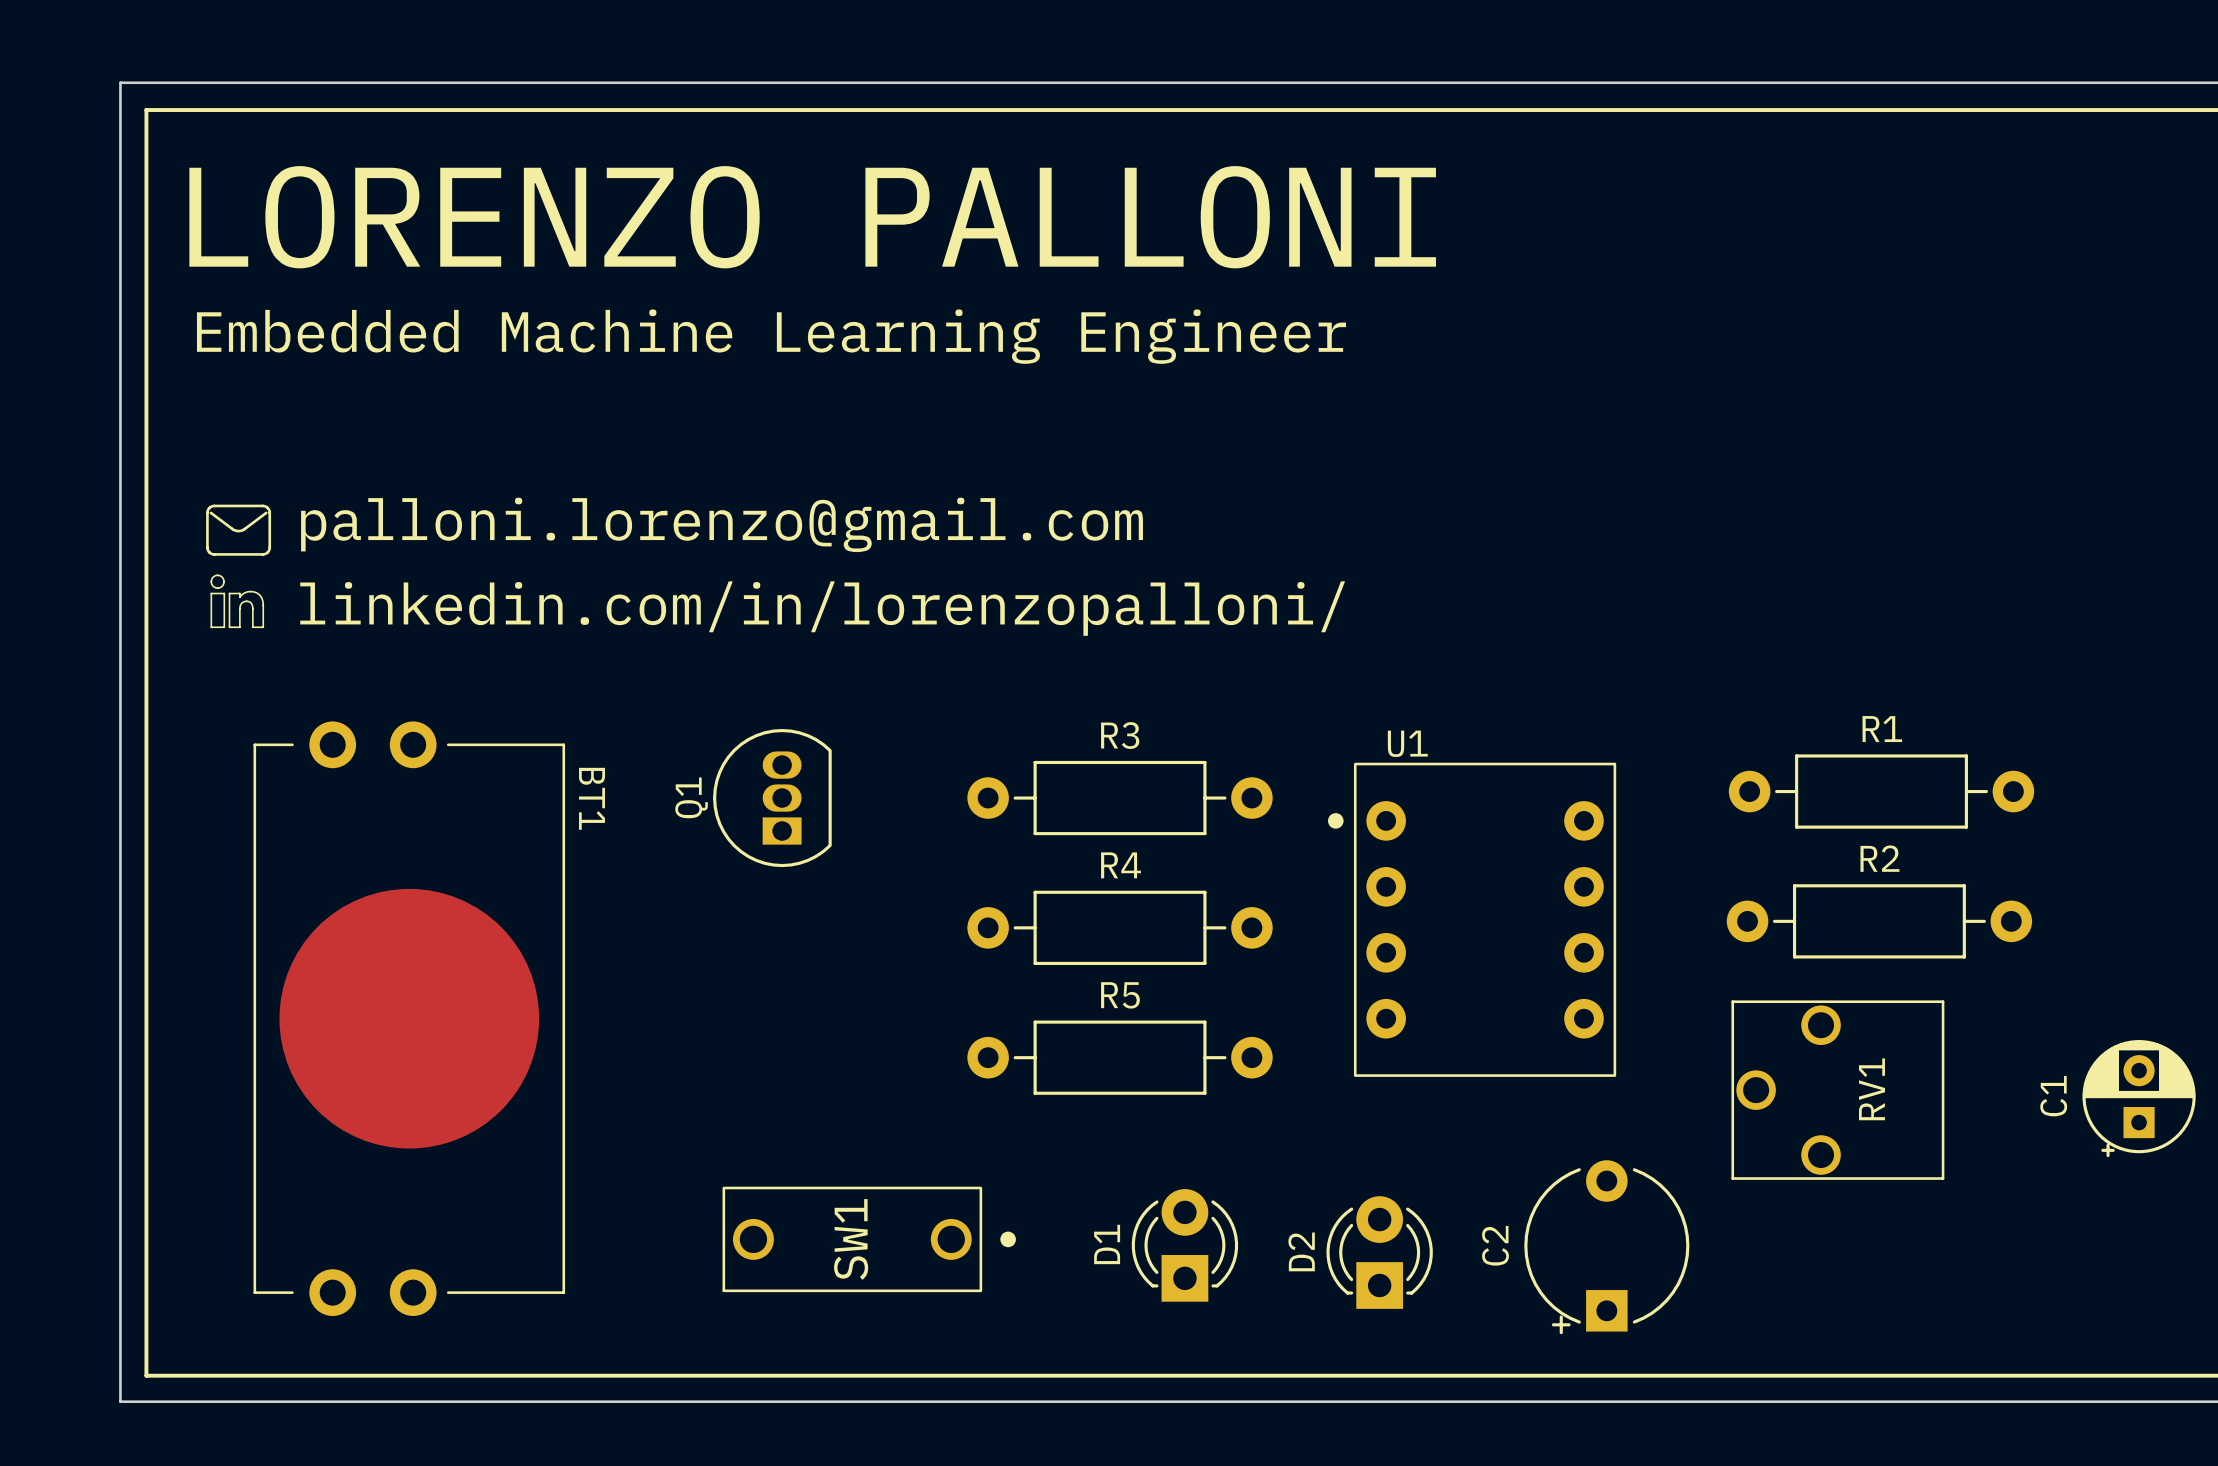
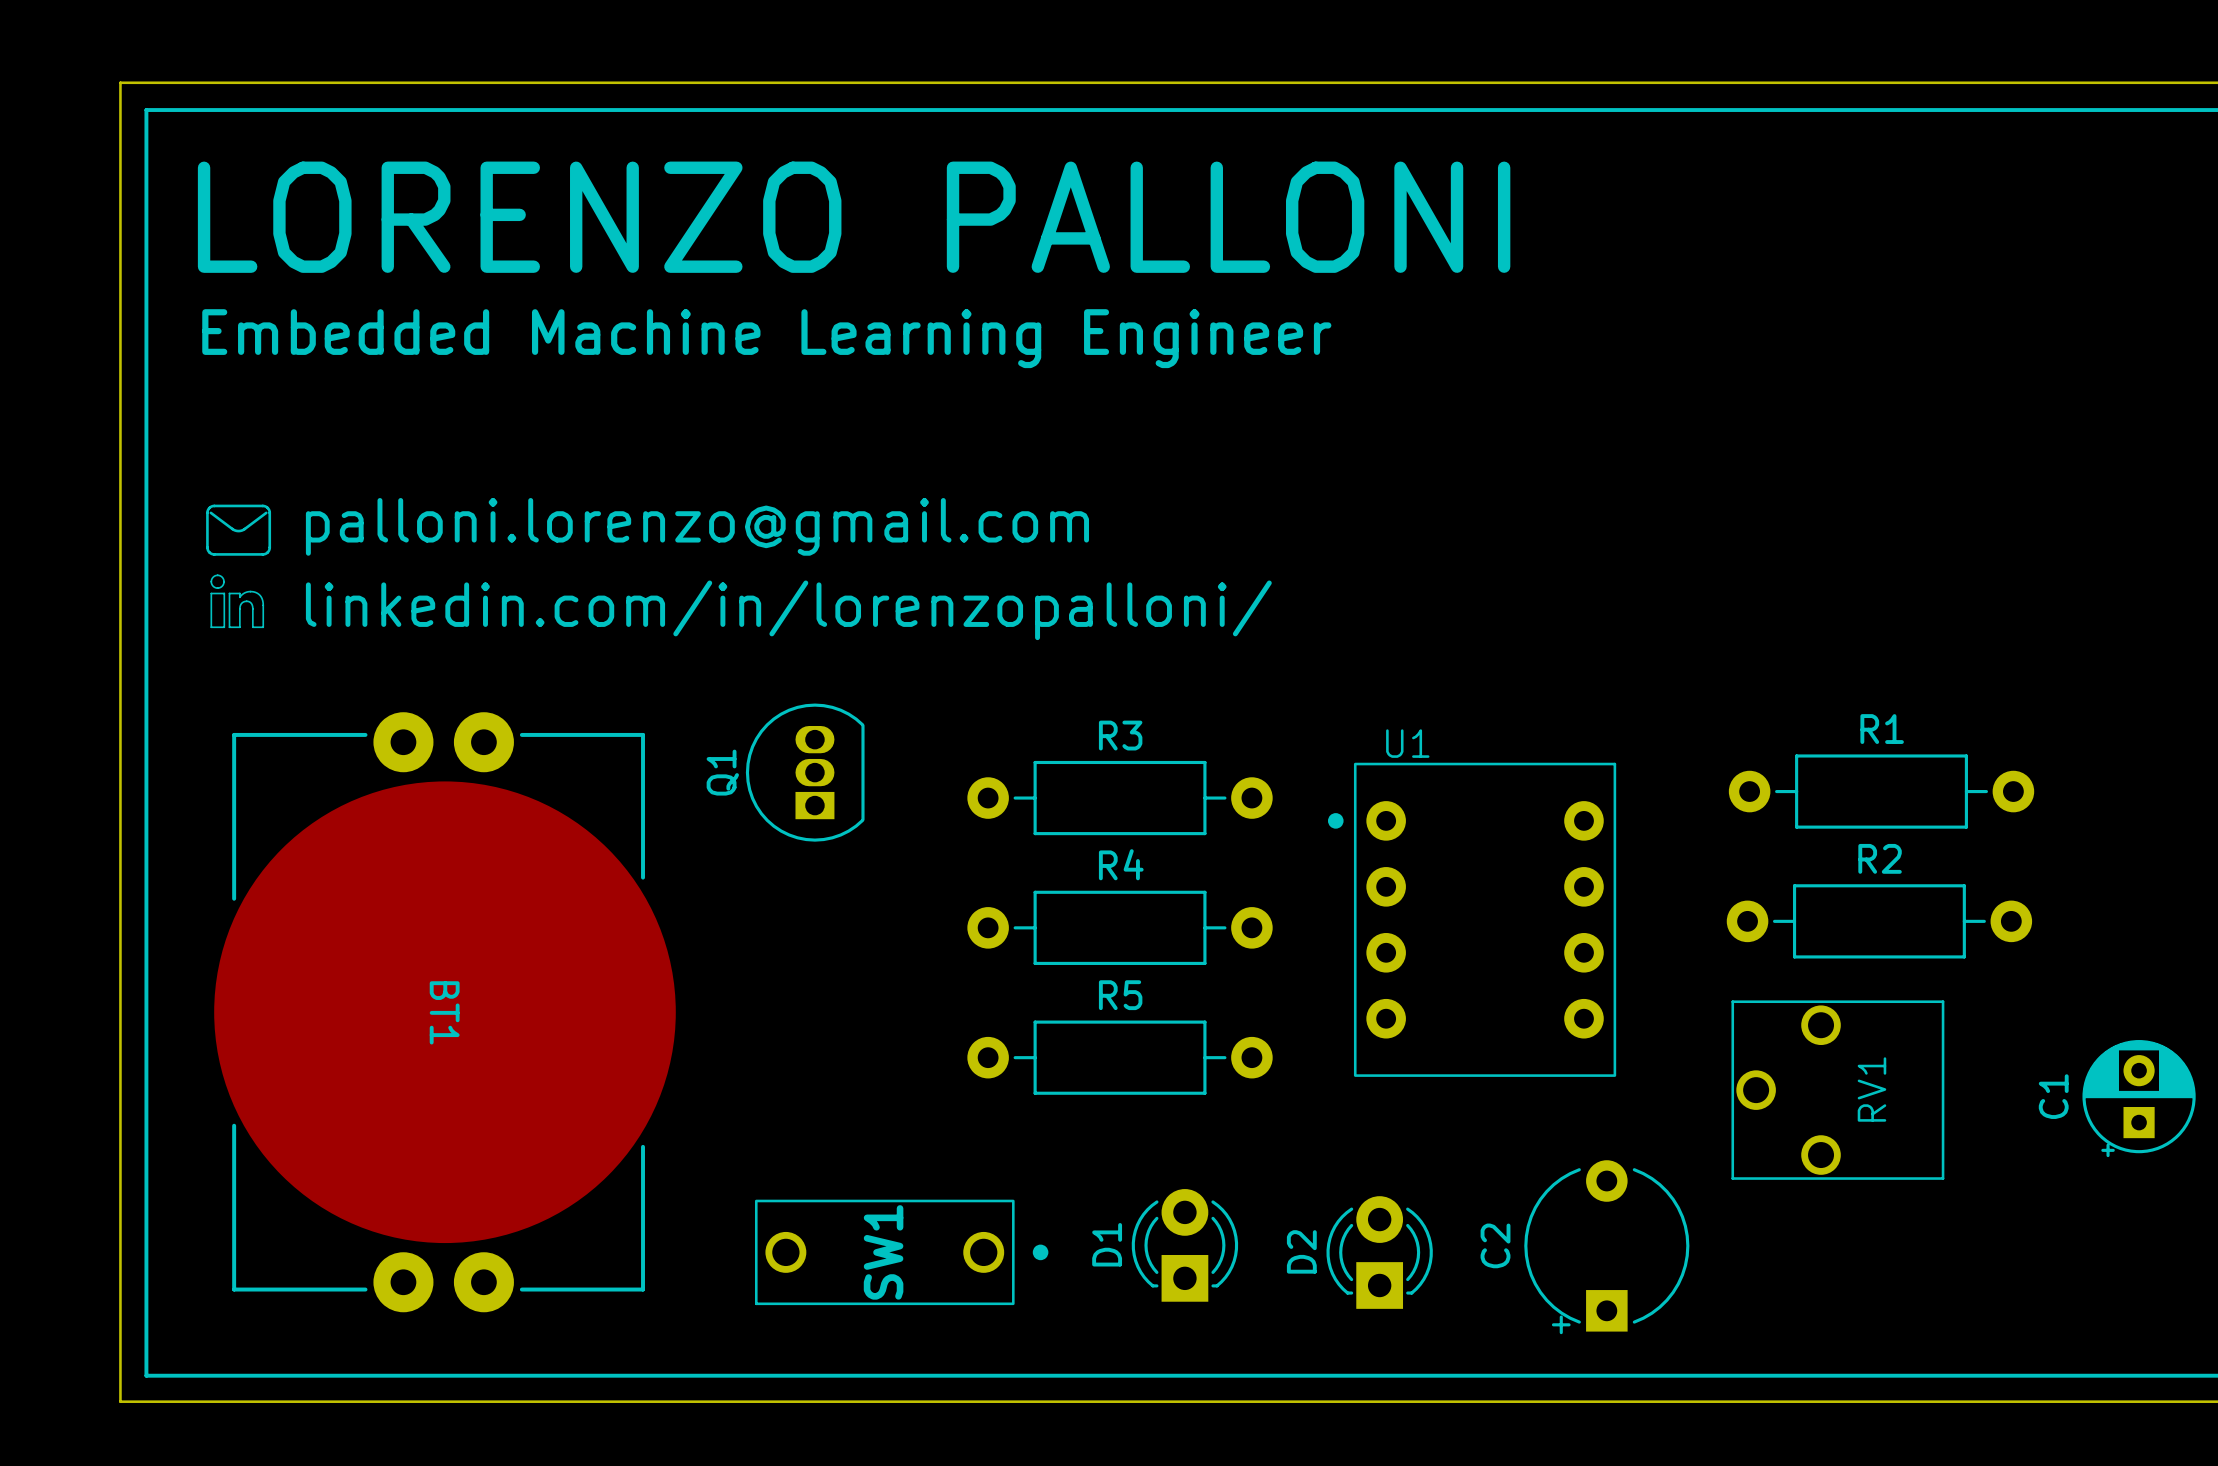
BT1 footprint: [253, 721, 566, 1317] -> [214, 712, 676, 1313]
BT1 name position: BT1 (592, 798) -> BT1 (444, 1012)
Q1 position: (772, 798) -> (805, 772)
SW1 position: (869, 1239) -> (901, 1252)

